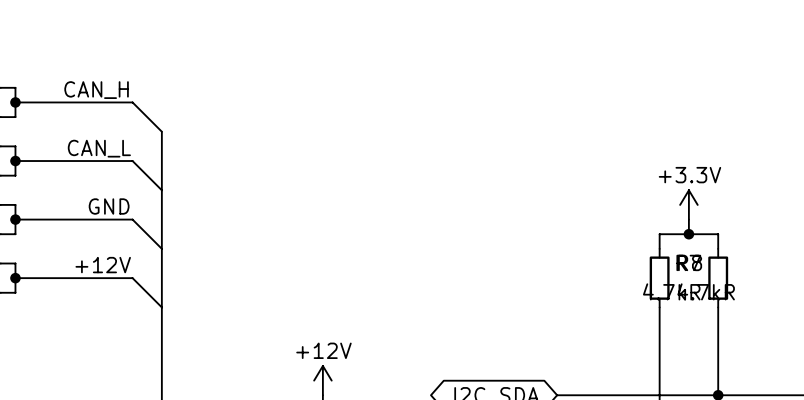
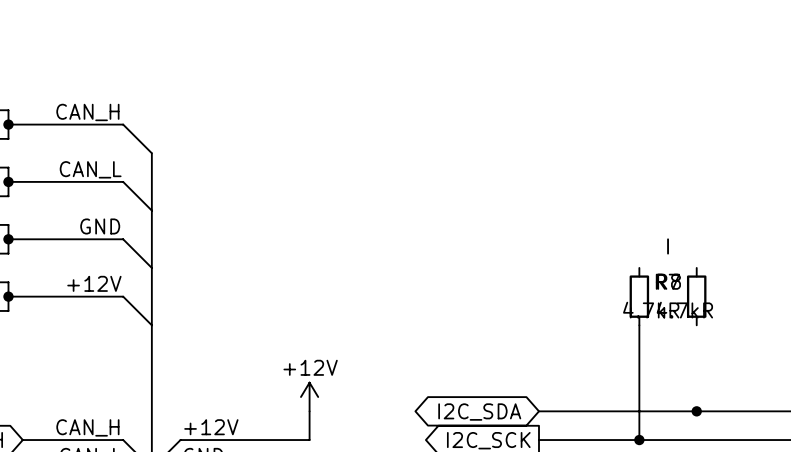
power symbol: +3.3V (688, 204) -> none
junction: (688, 234) -> none
wire: (659, 248) (659, 234) (718, 234) (718, 248) -> none
wire: (718, 307) (718, 395) -> none

